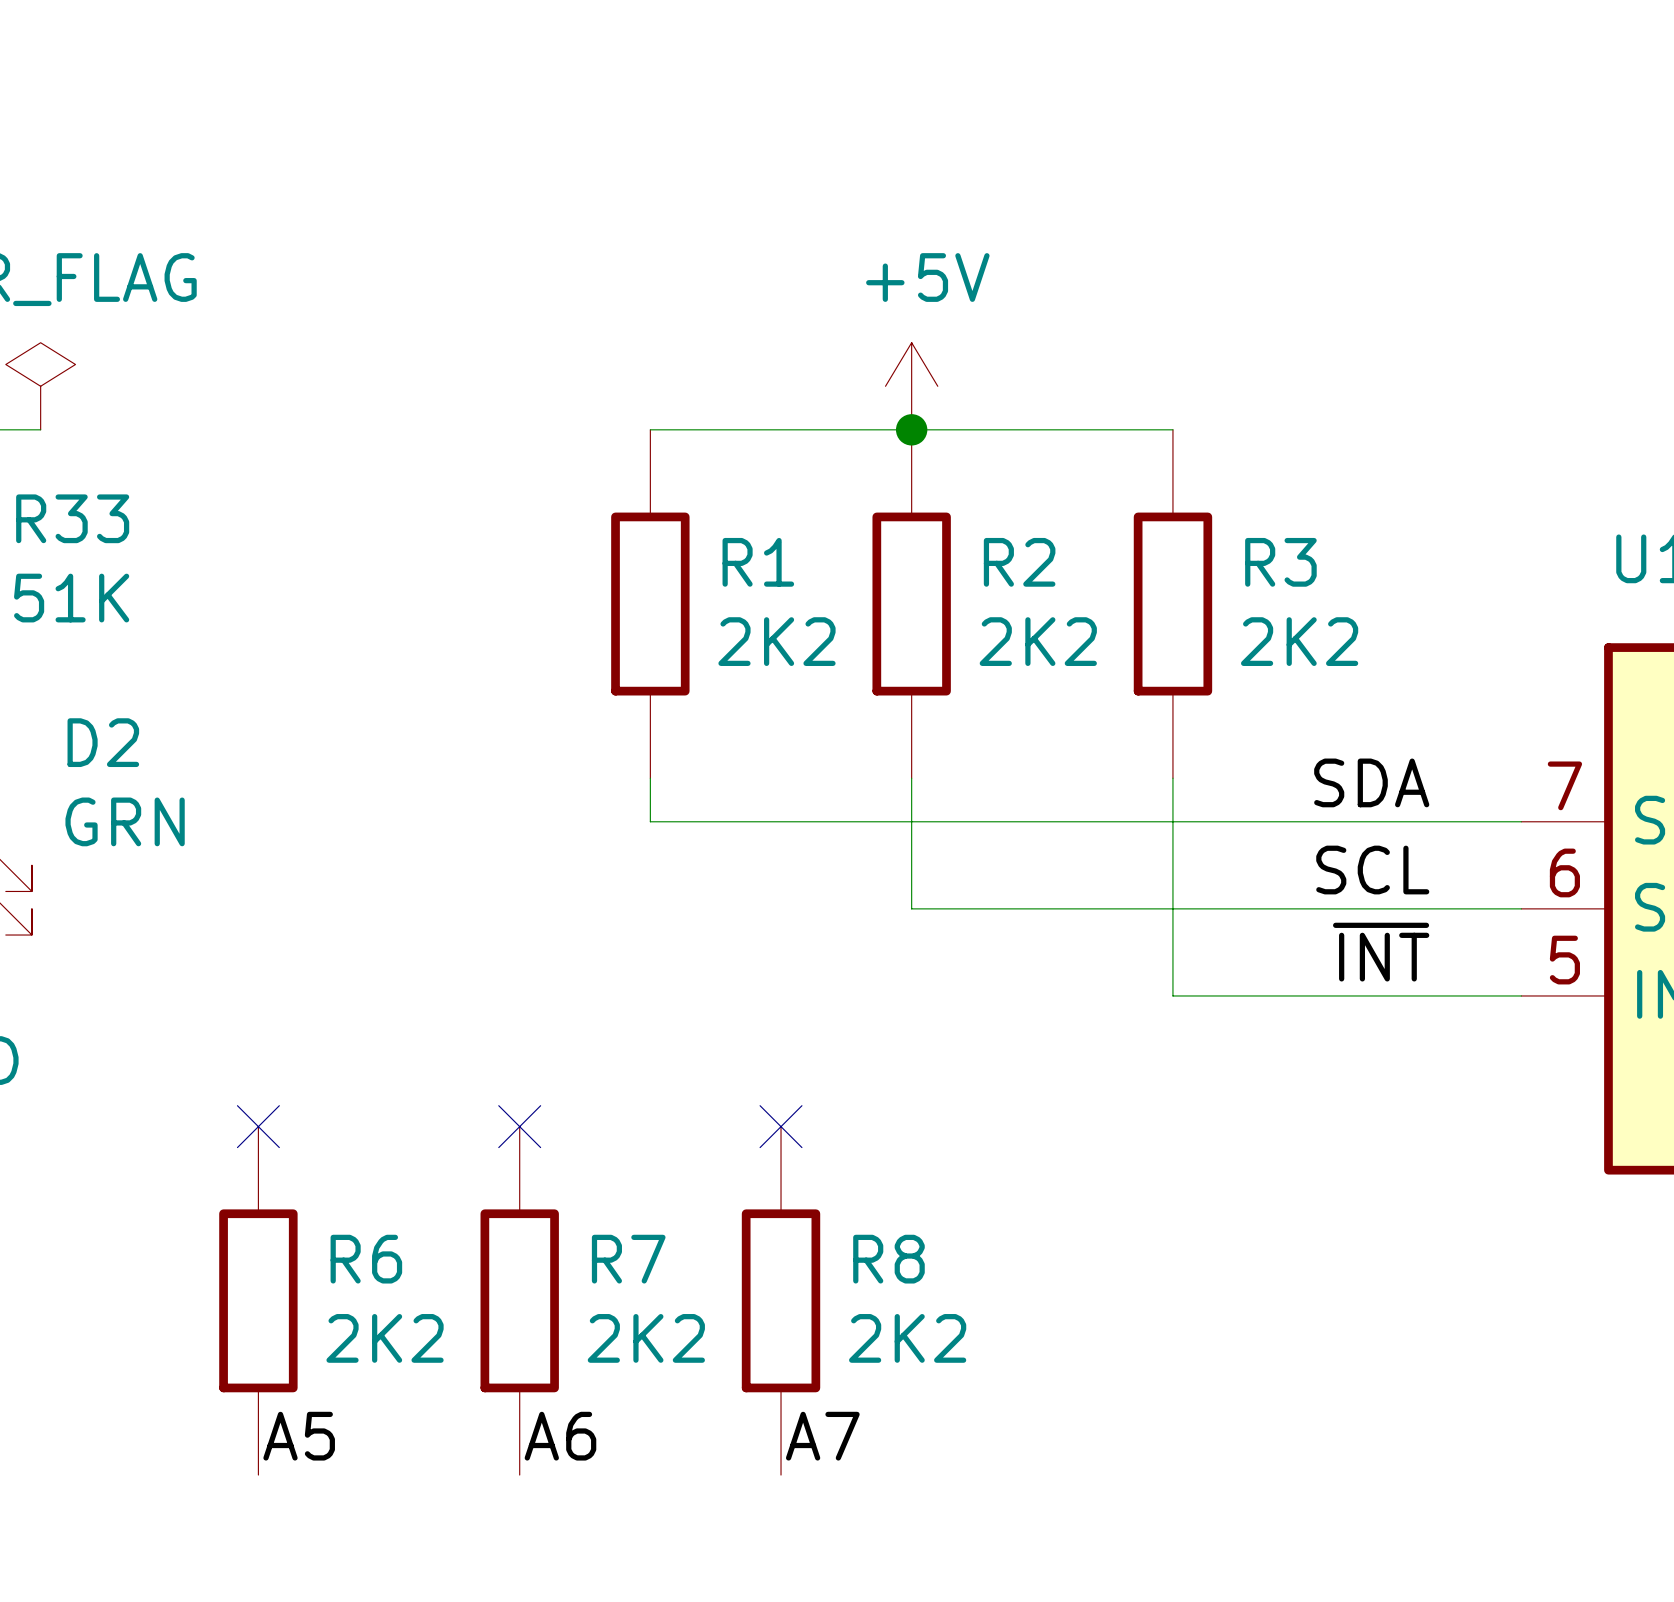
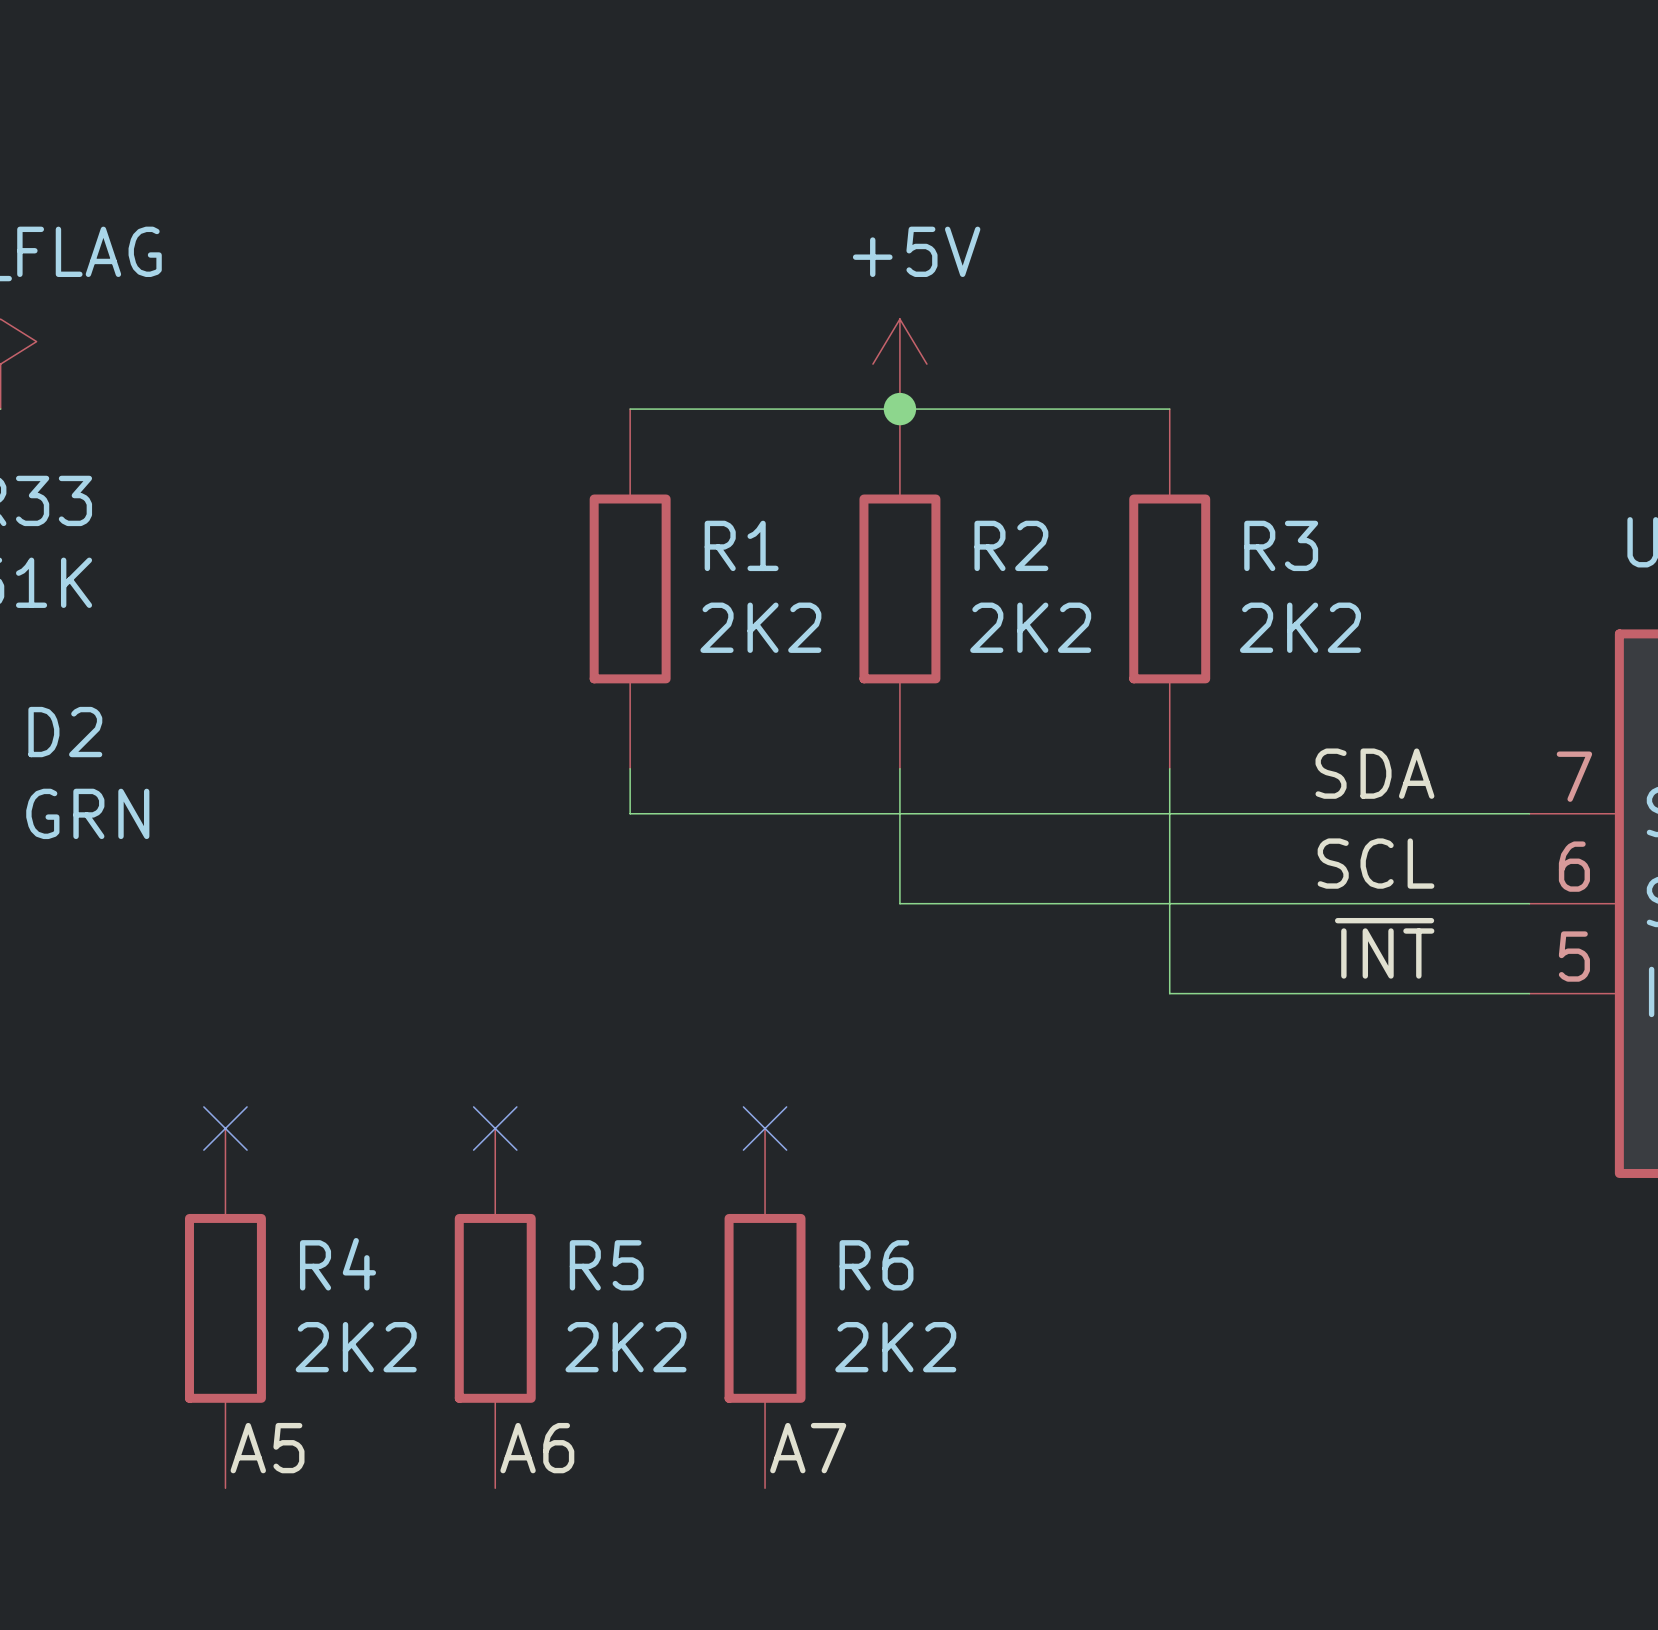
R6 name: R6 (366, 1259) -> R4 (337, 1264)
R7 name: R7 (628, 1259) -> R5 (606, 1265)
R8 name: R8 (888, 1259) -> R6 (876, 1265)

